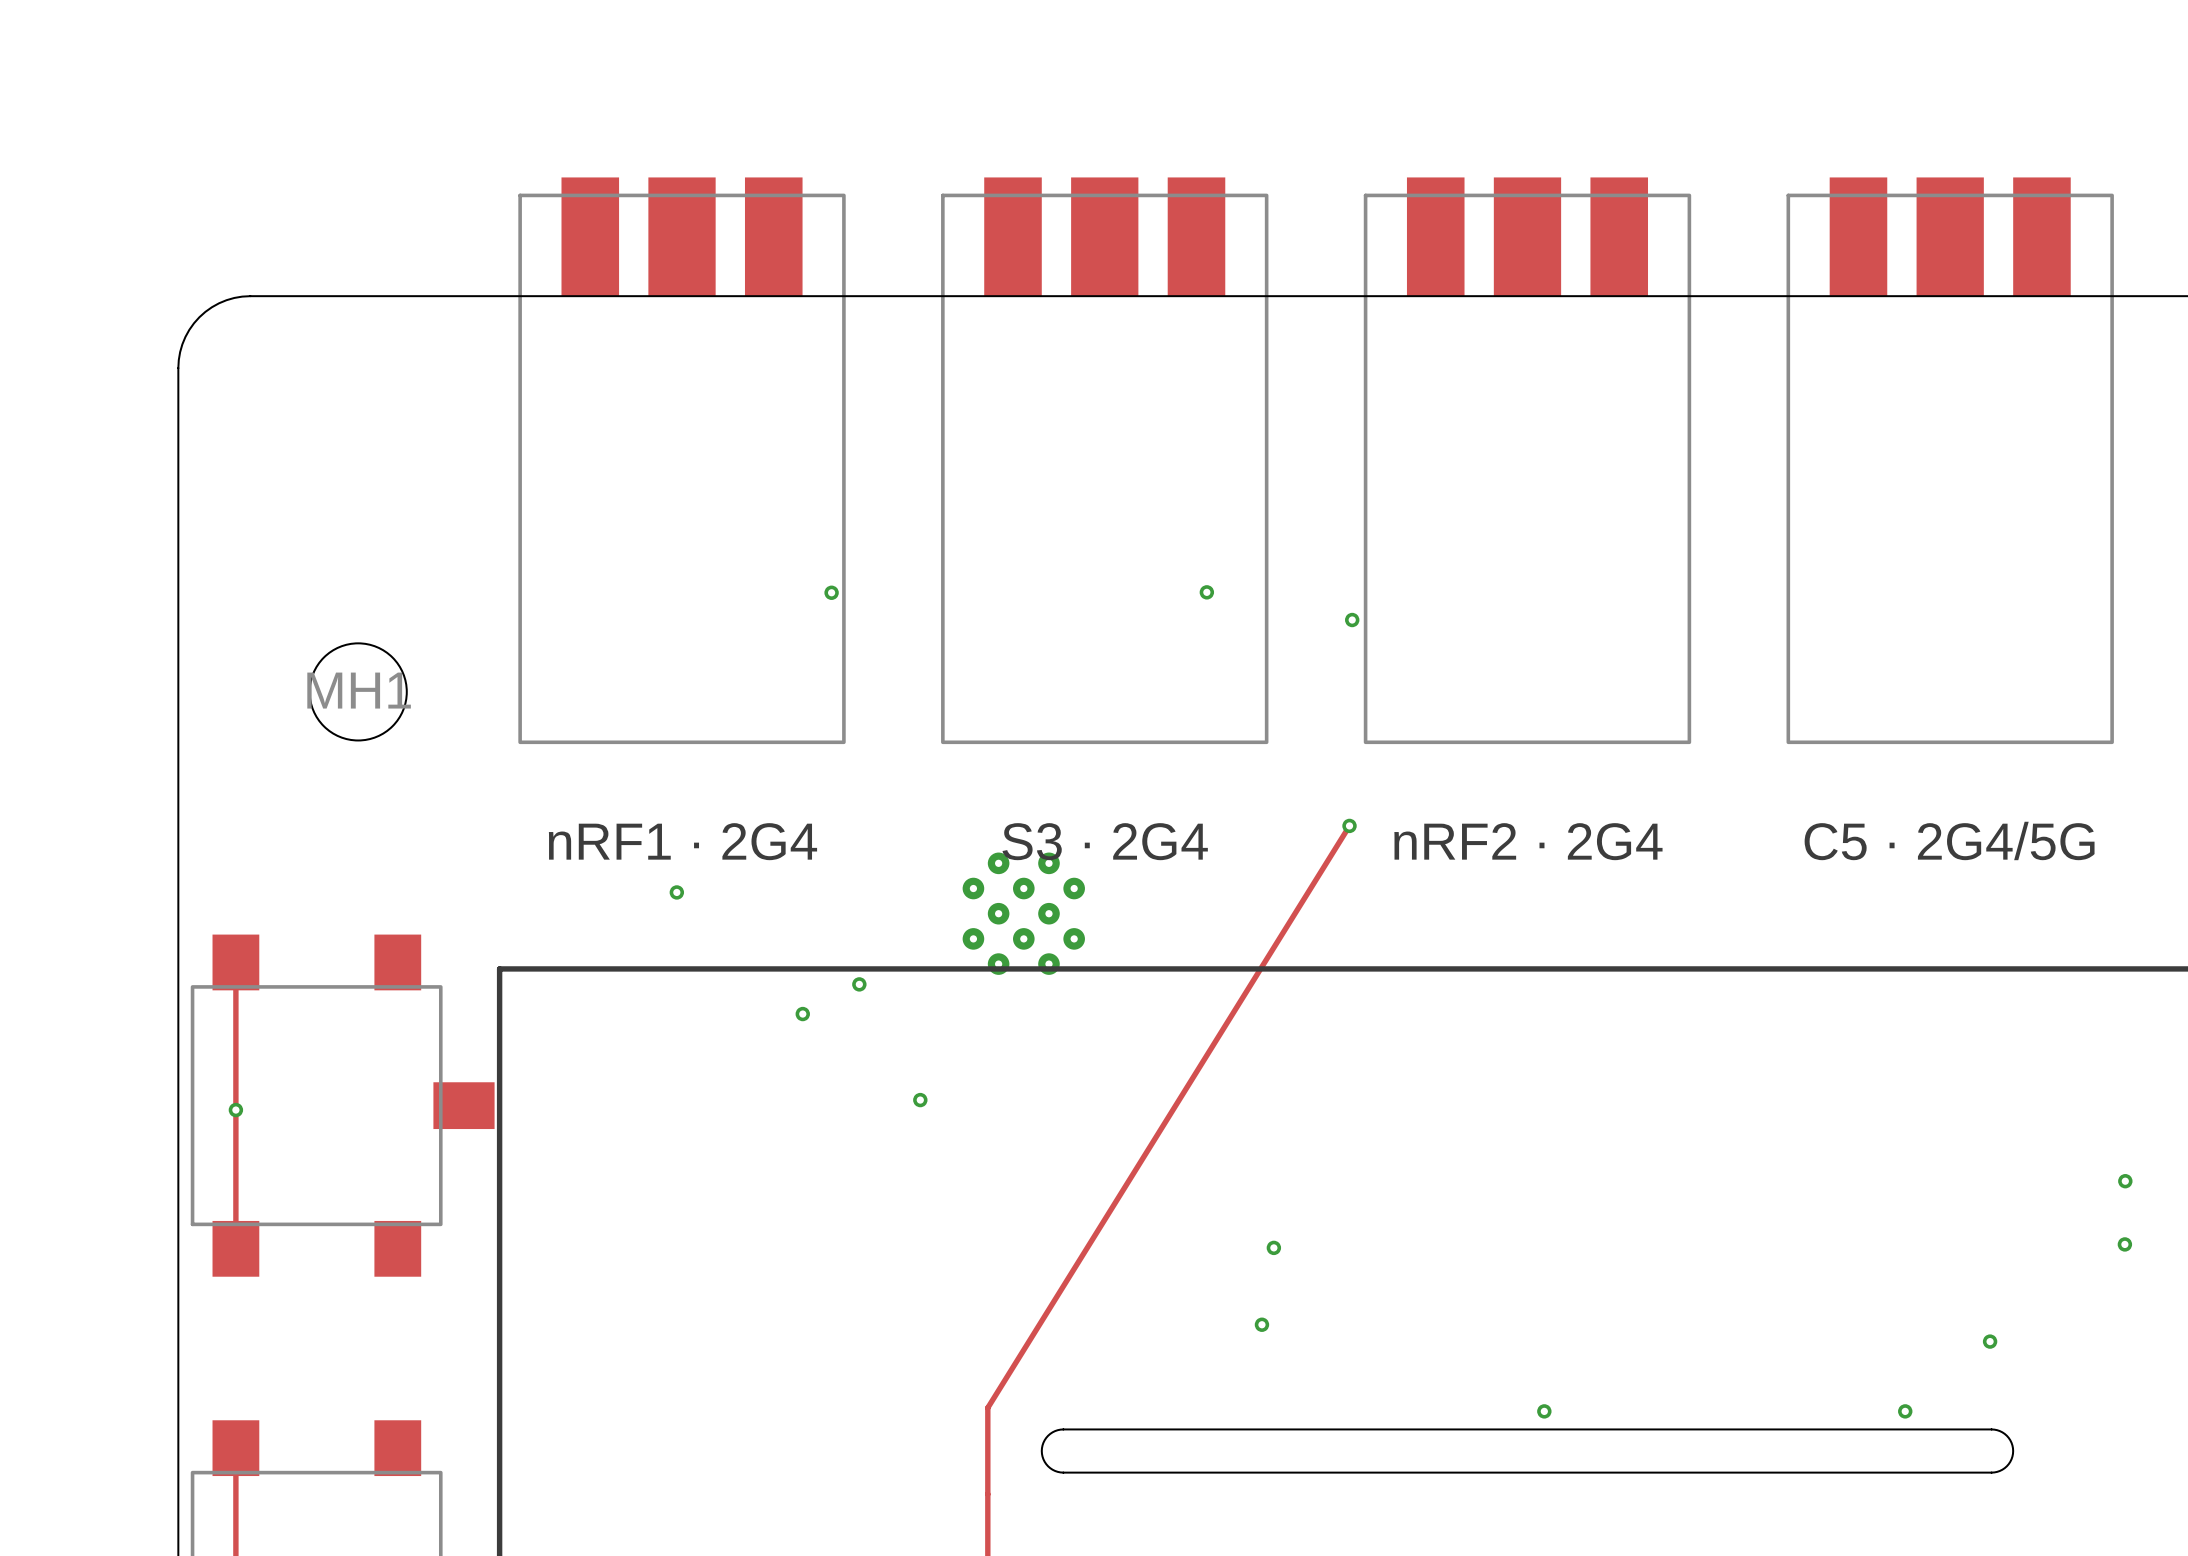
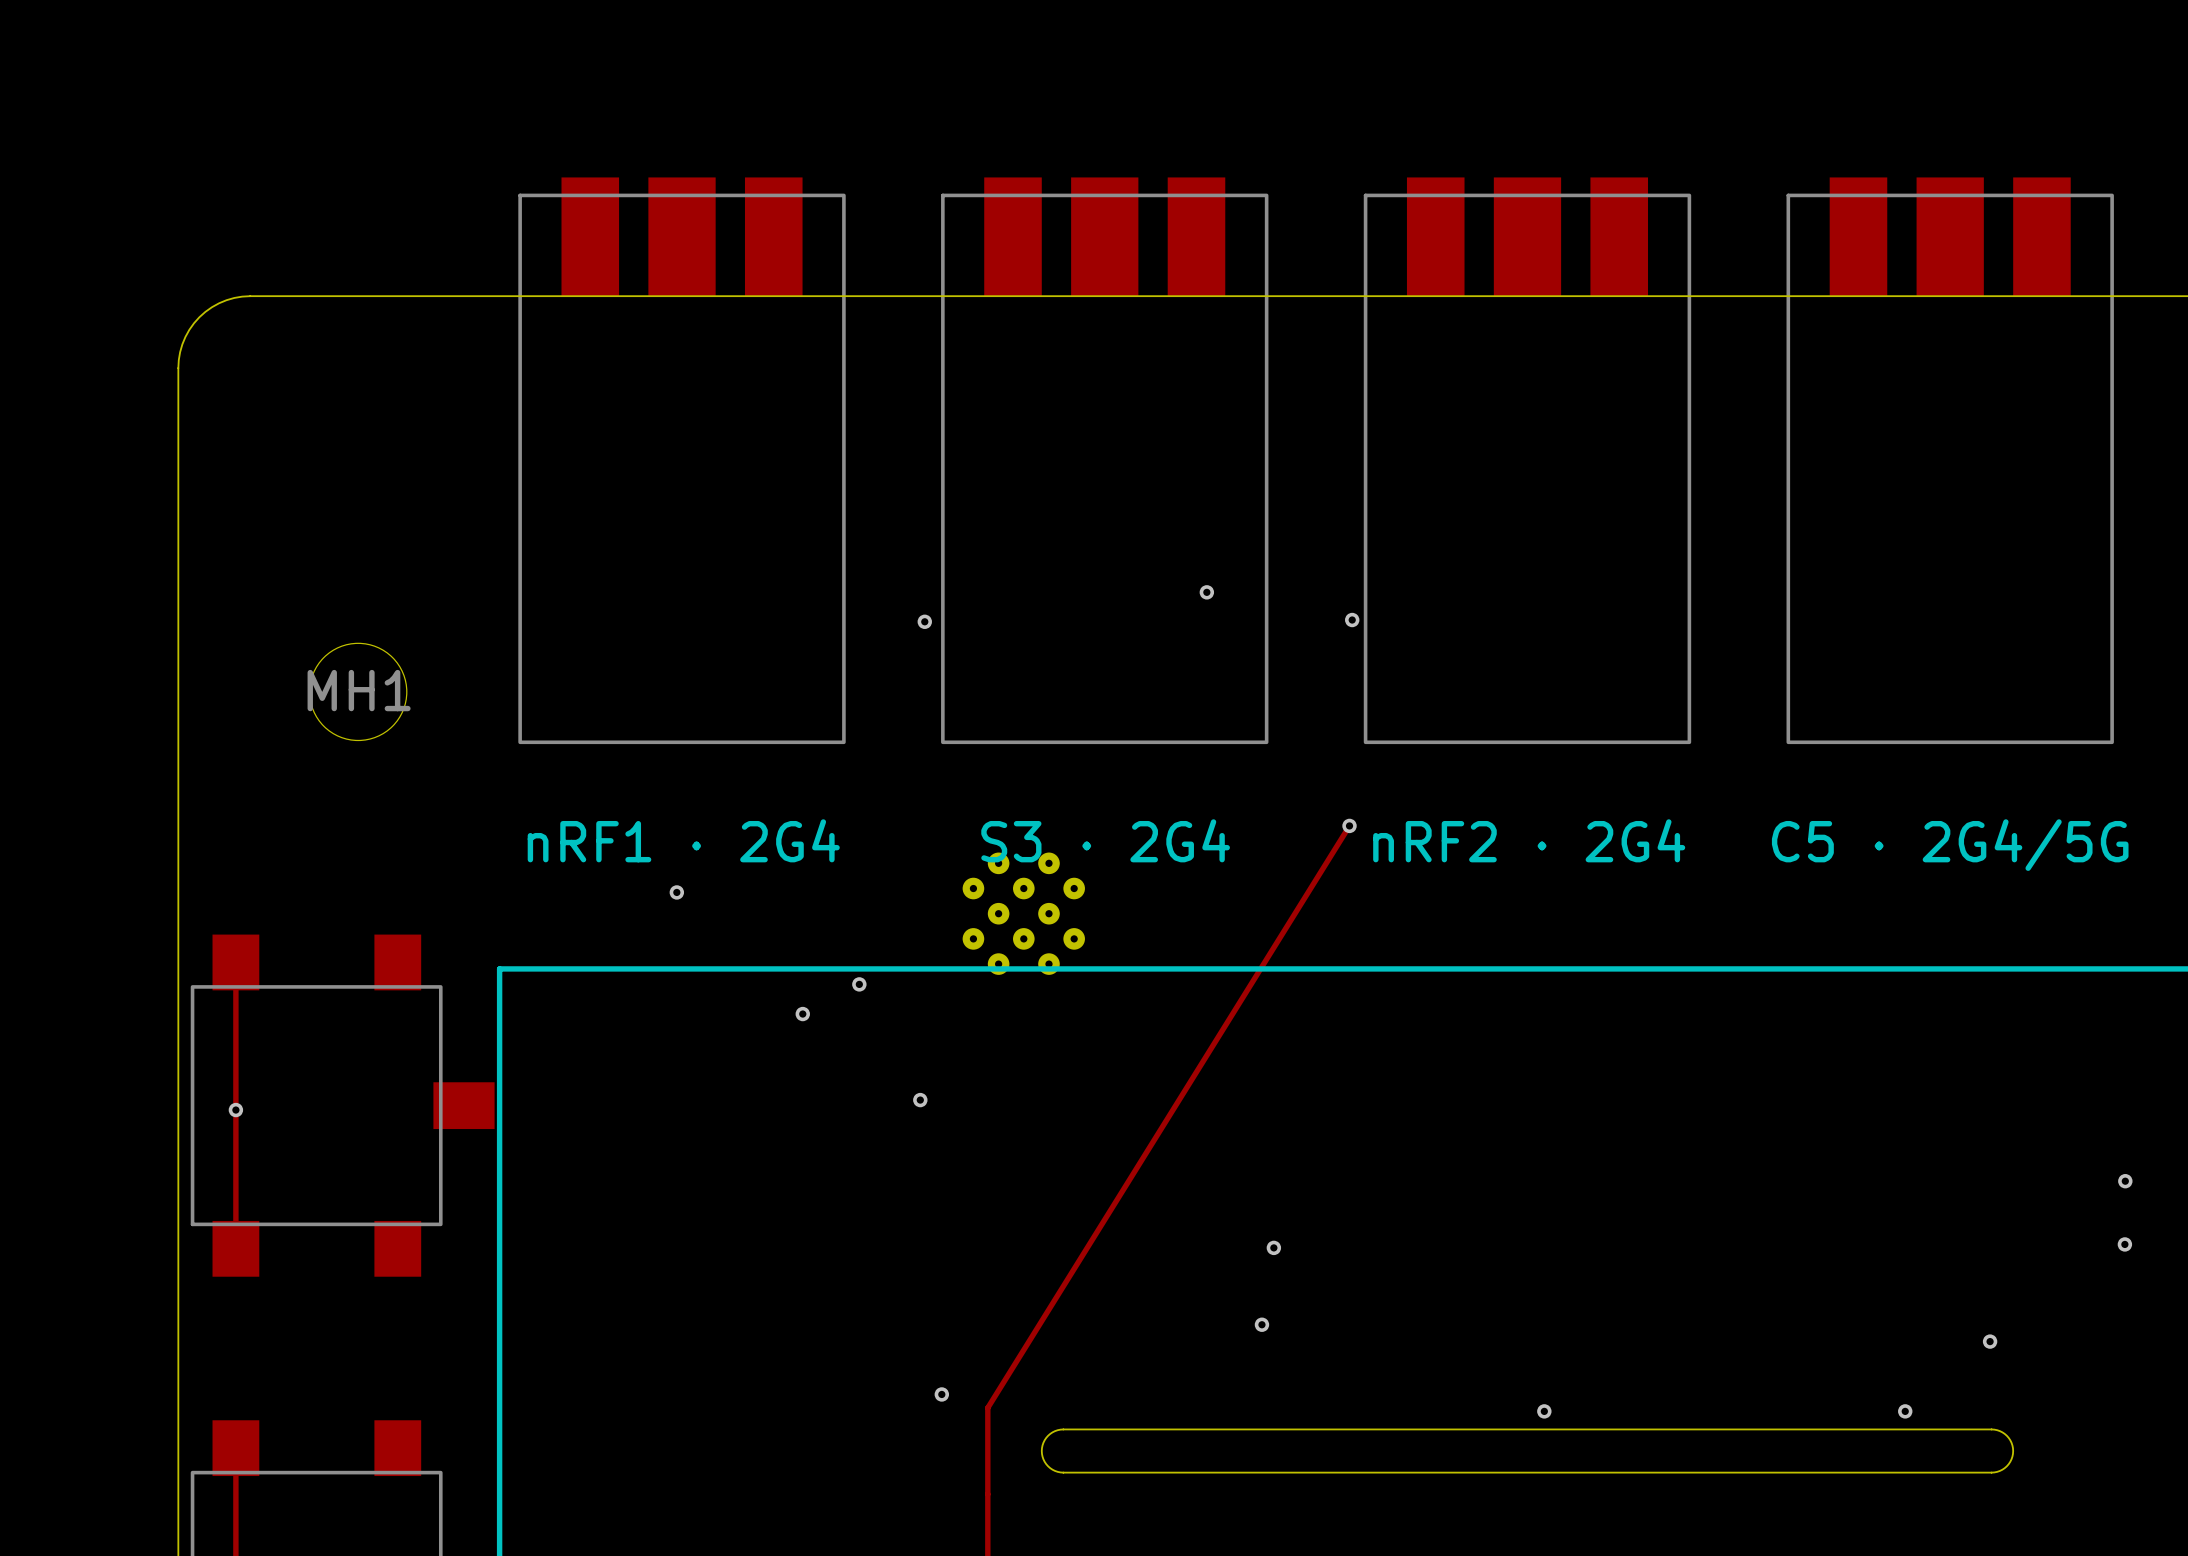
via position: (831, 592) -> (924, 621)
via: none -> (941, 1394)

